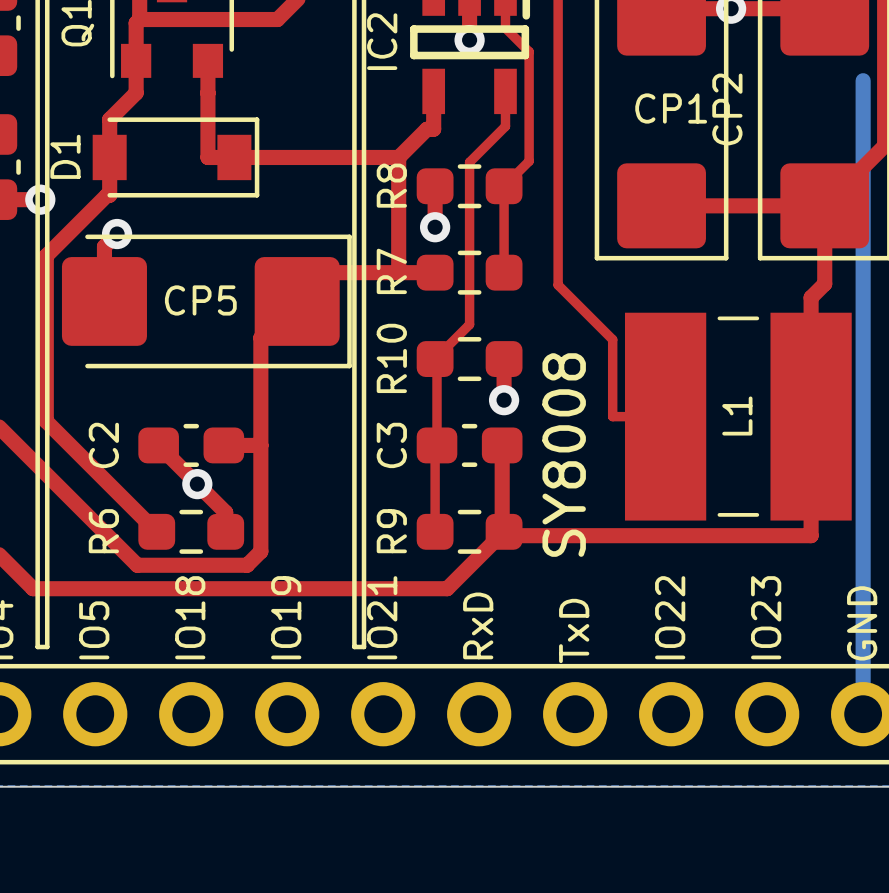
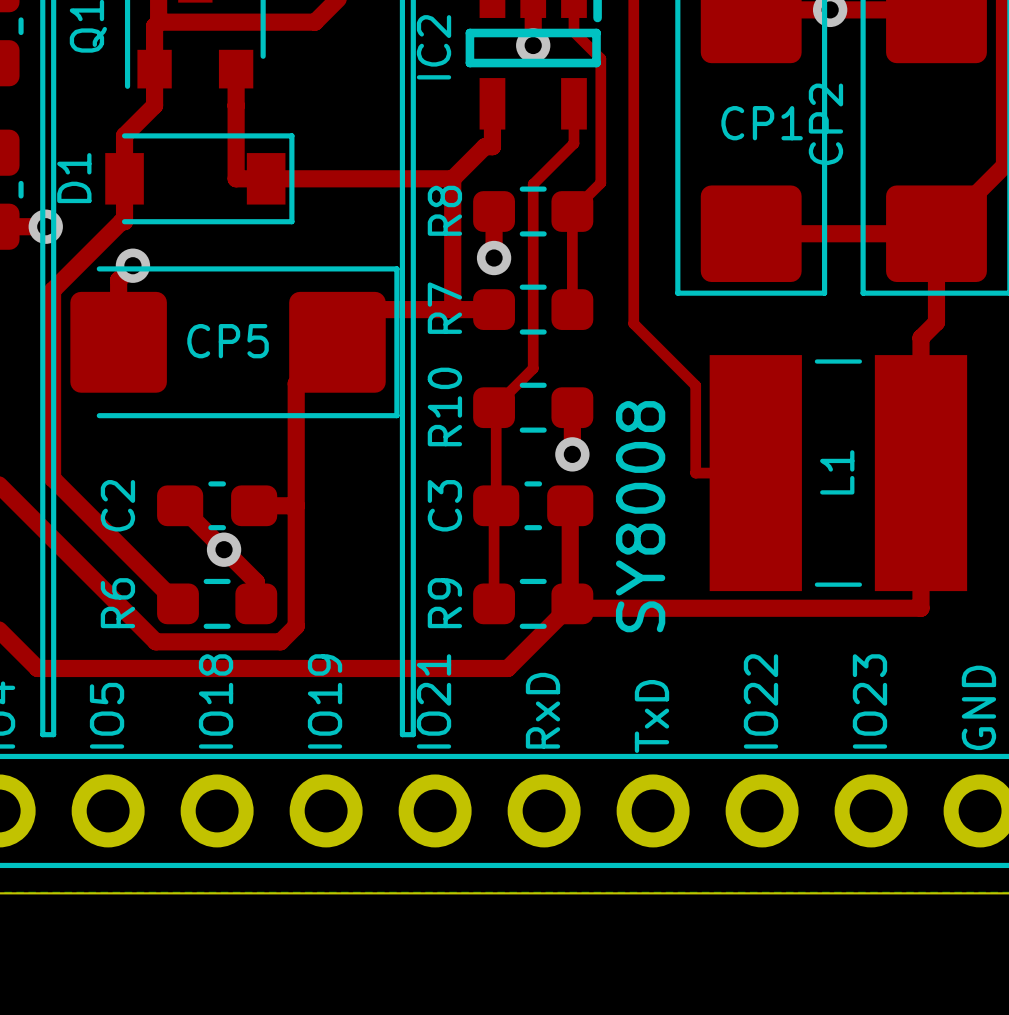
bottom track: (863, 80) (863, 714) -> none

